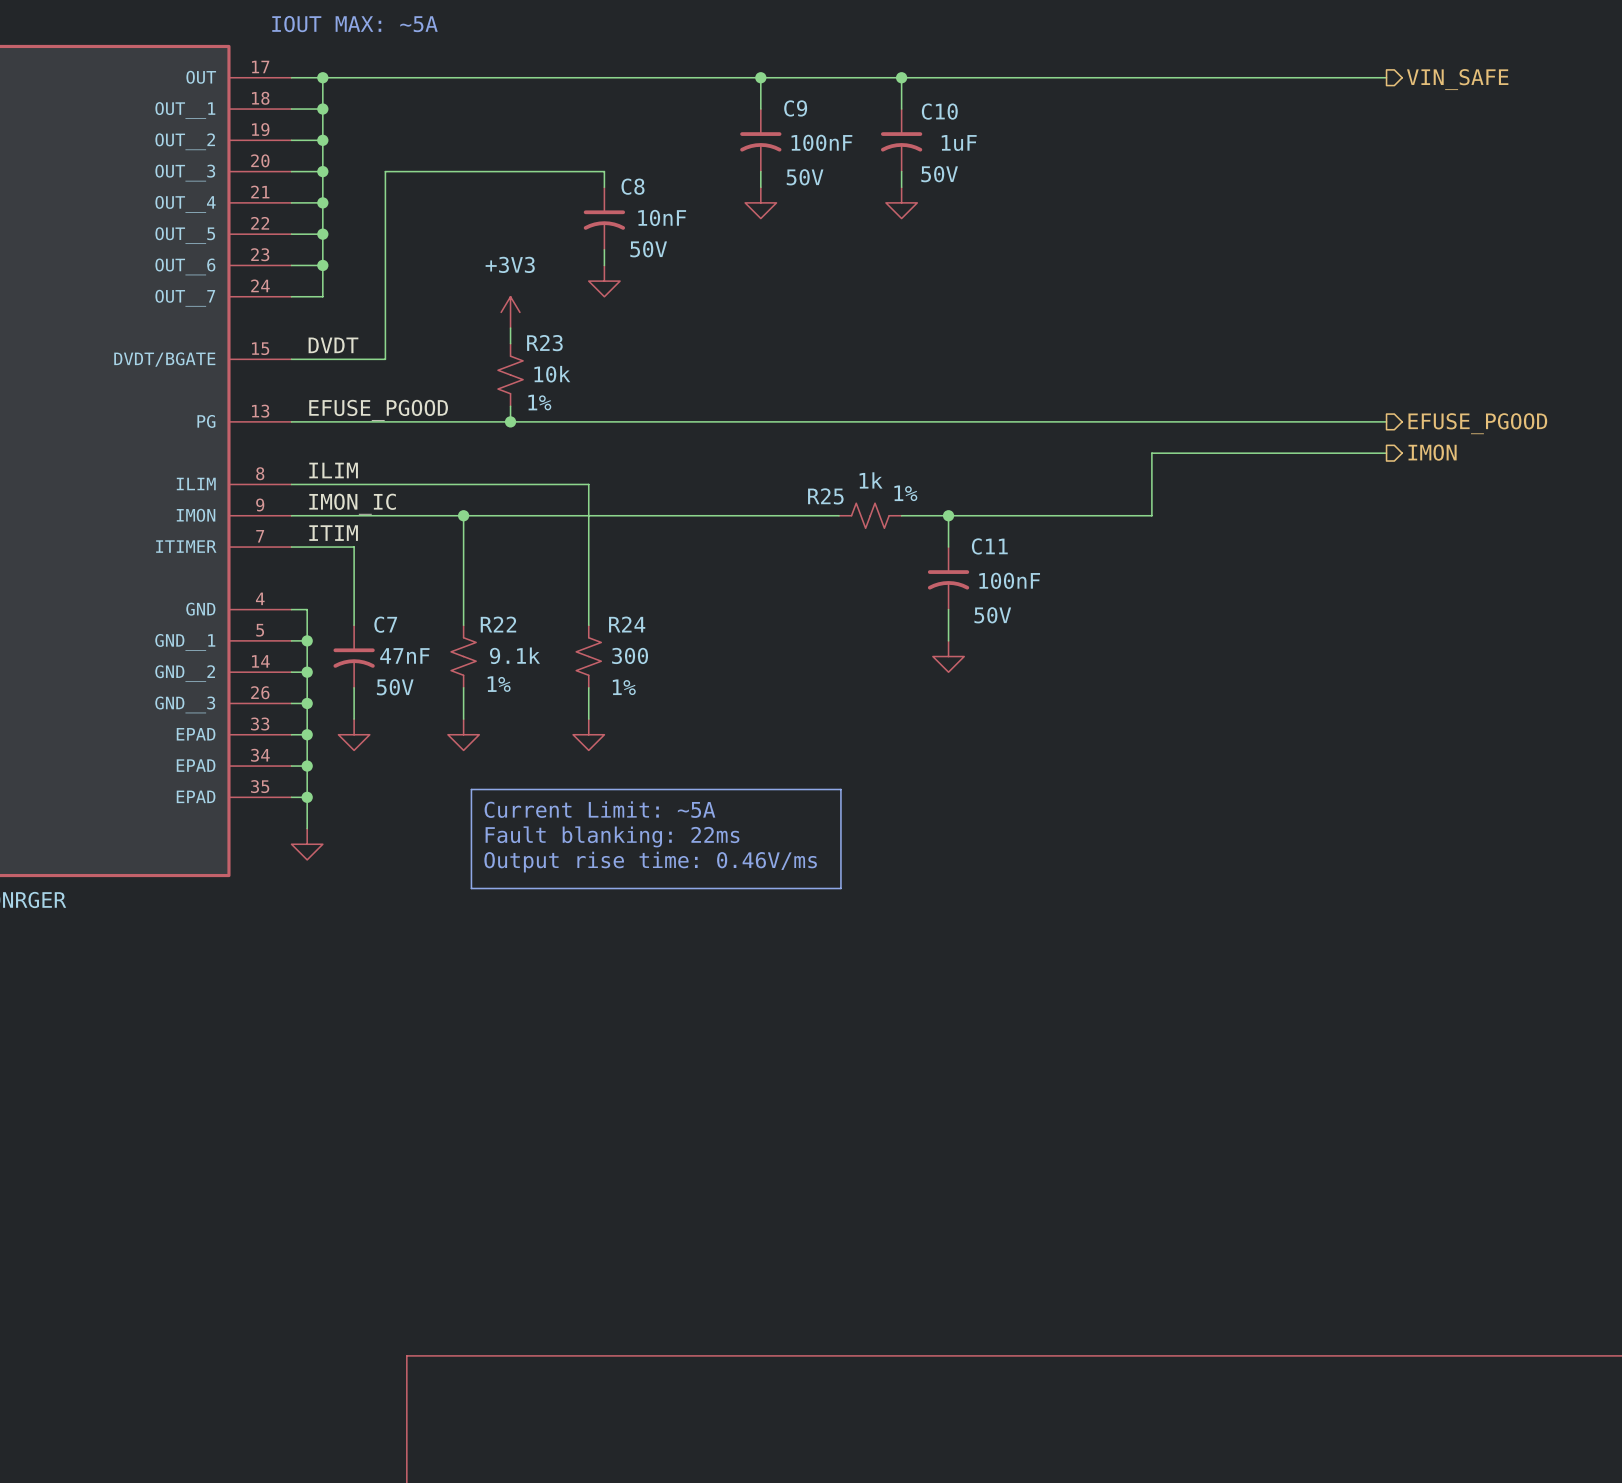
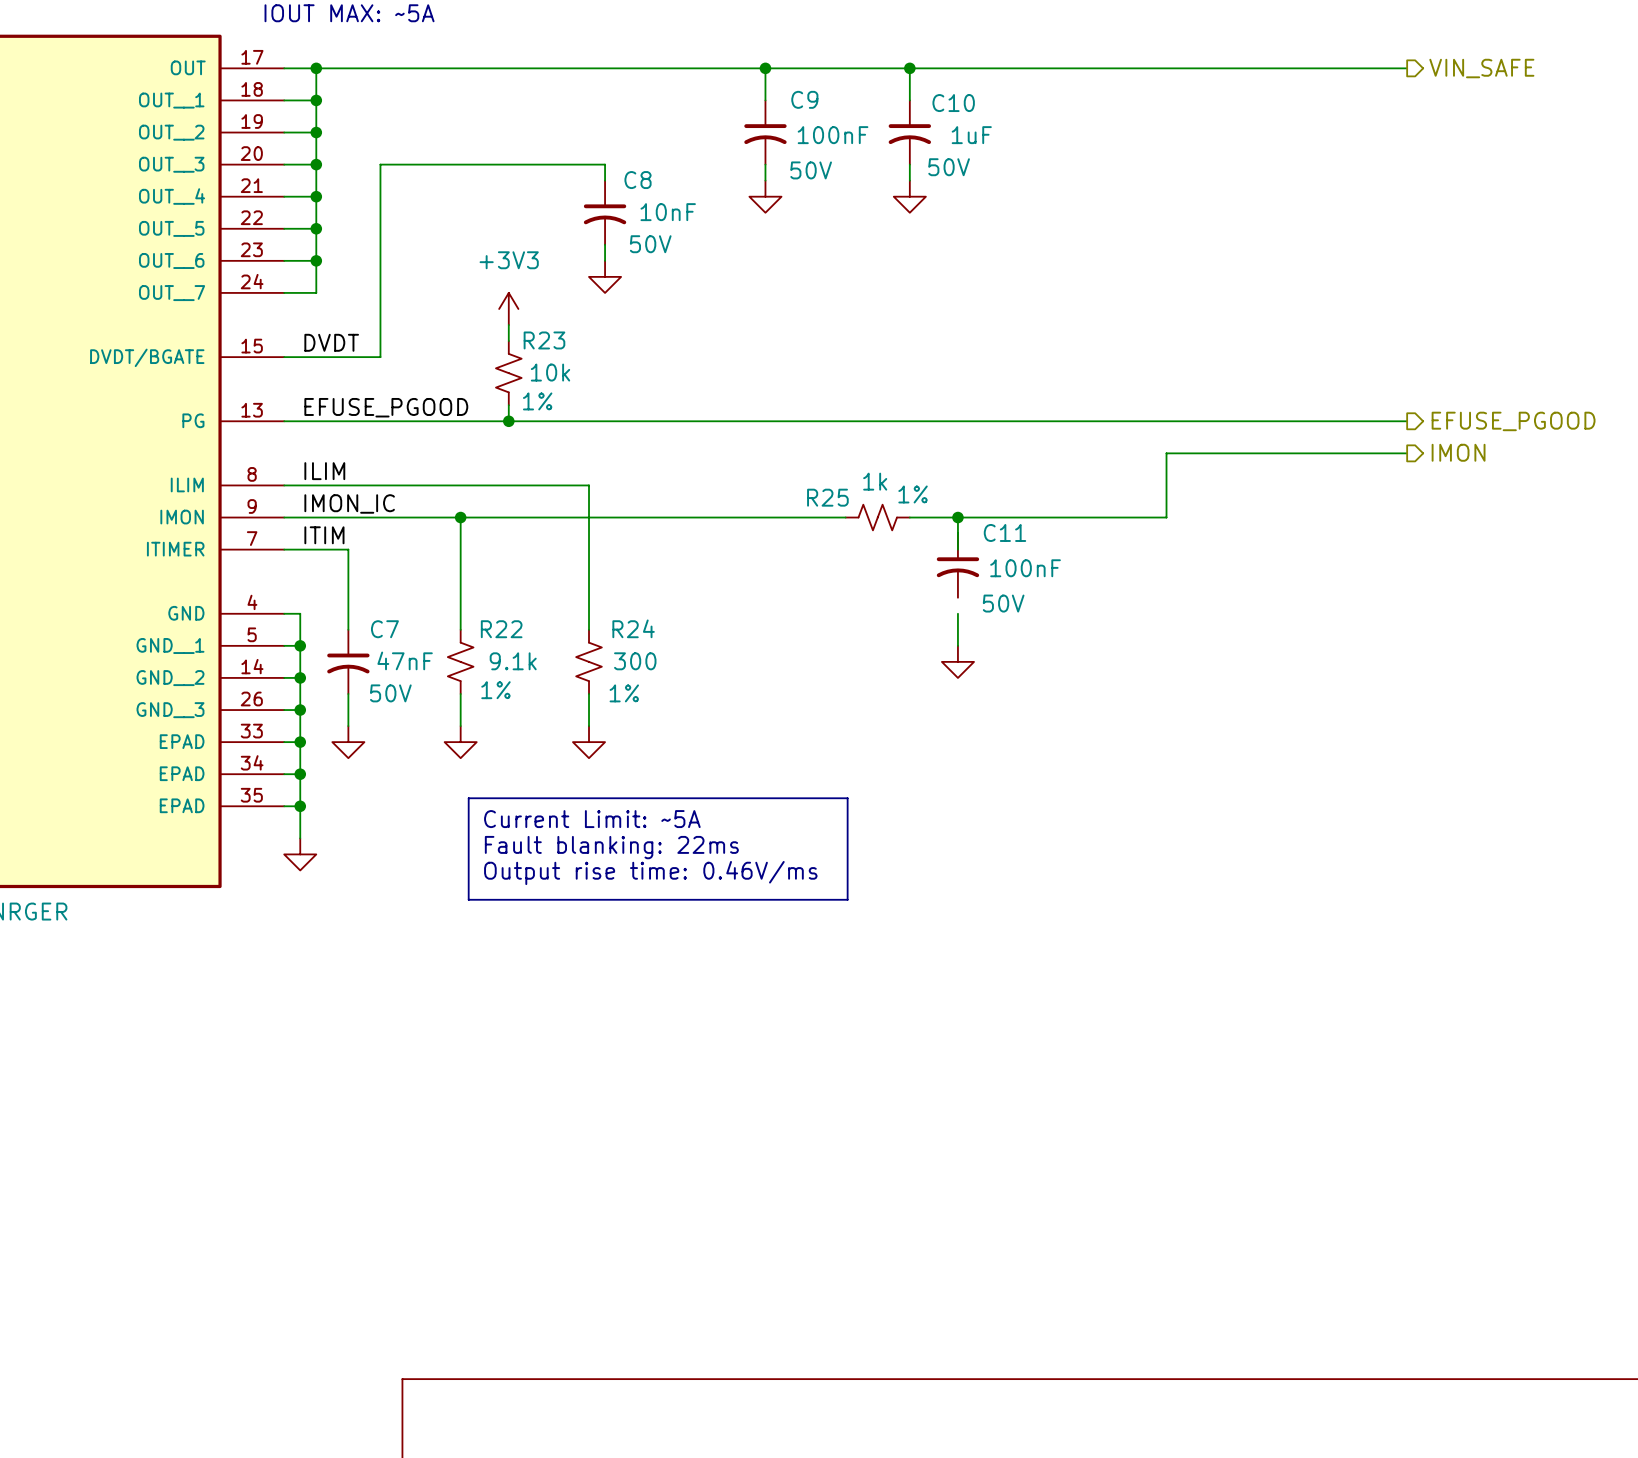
C11 position: (948, 578) -> (957, 565)

